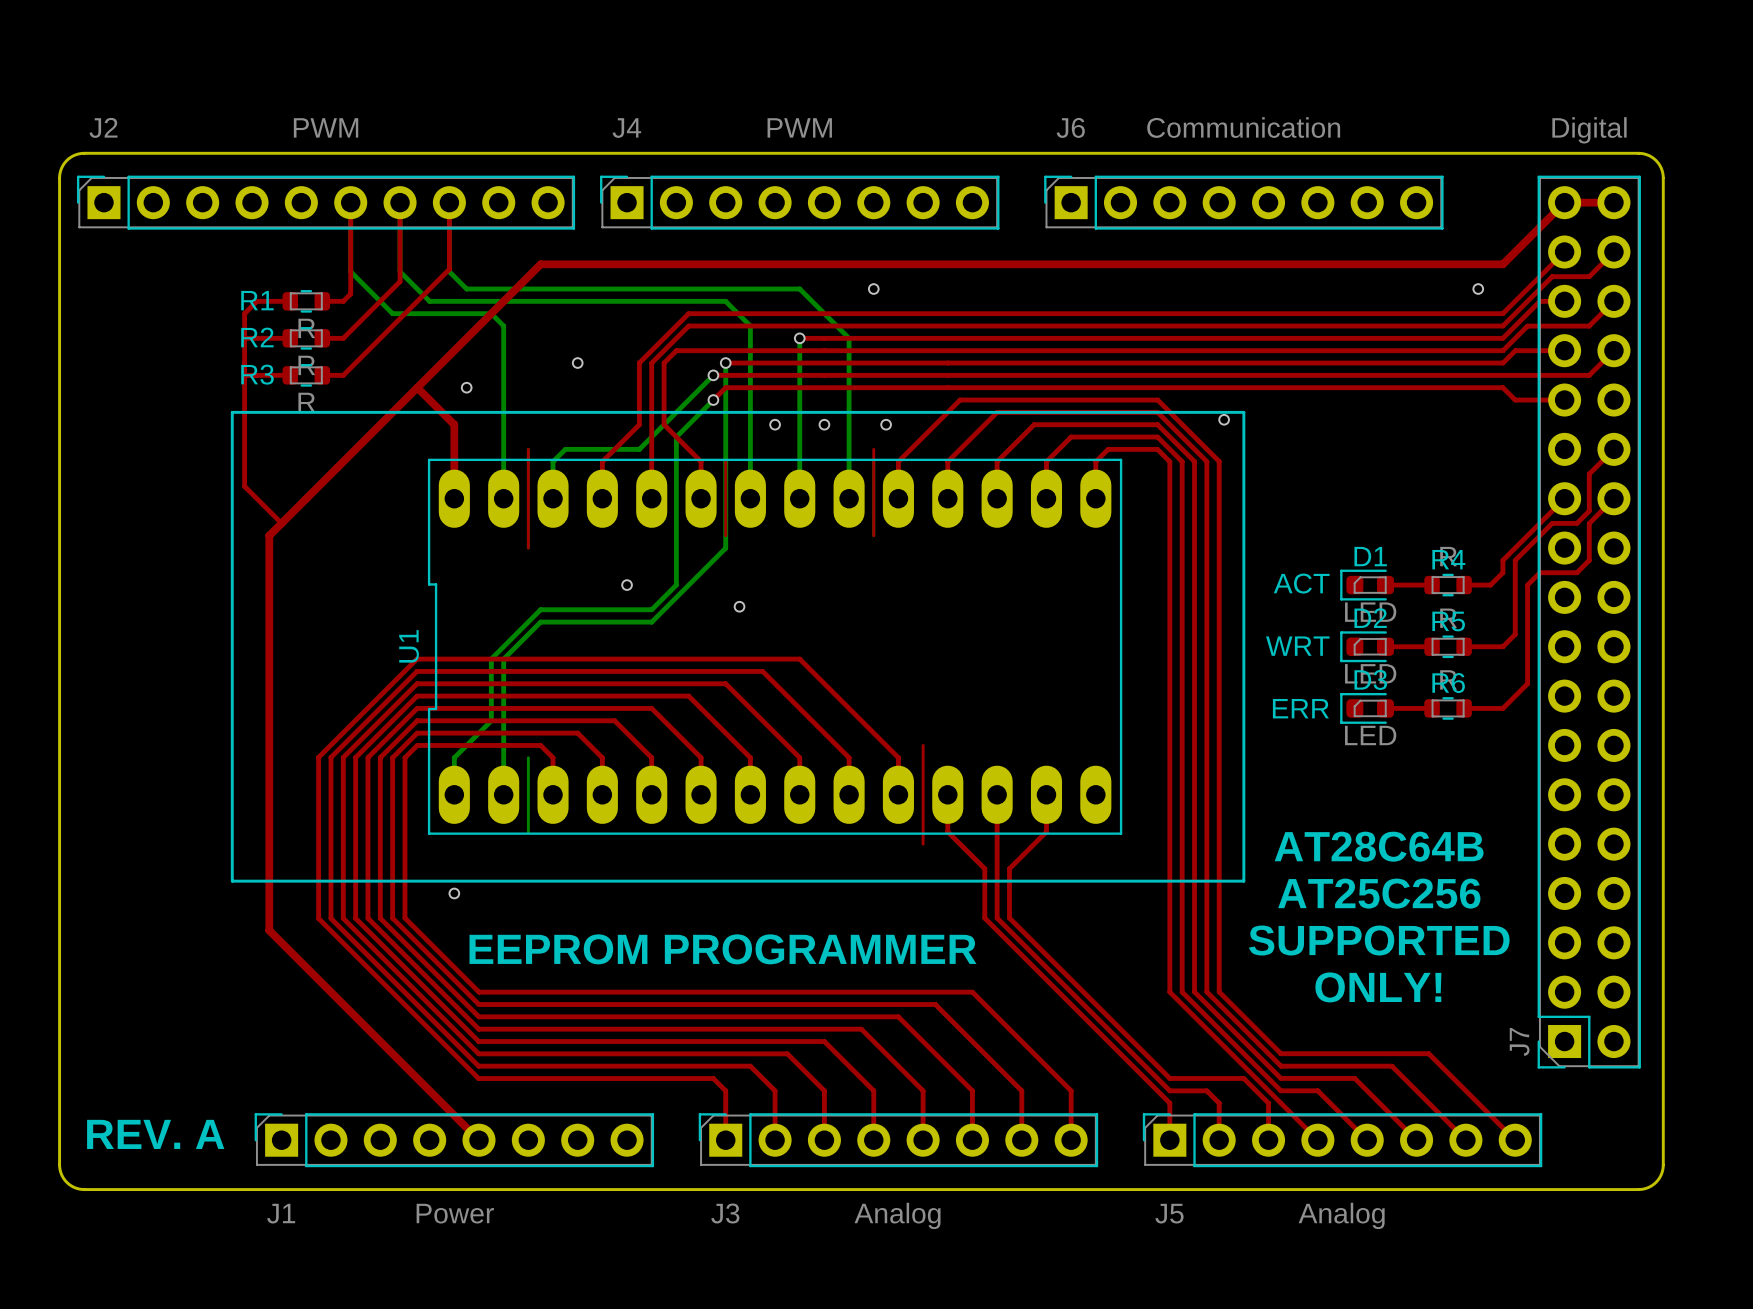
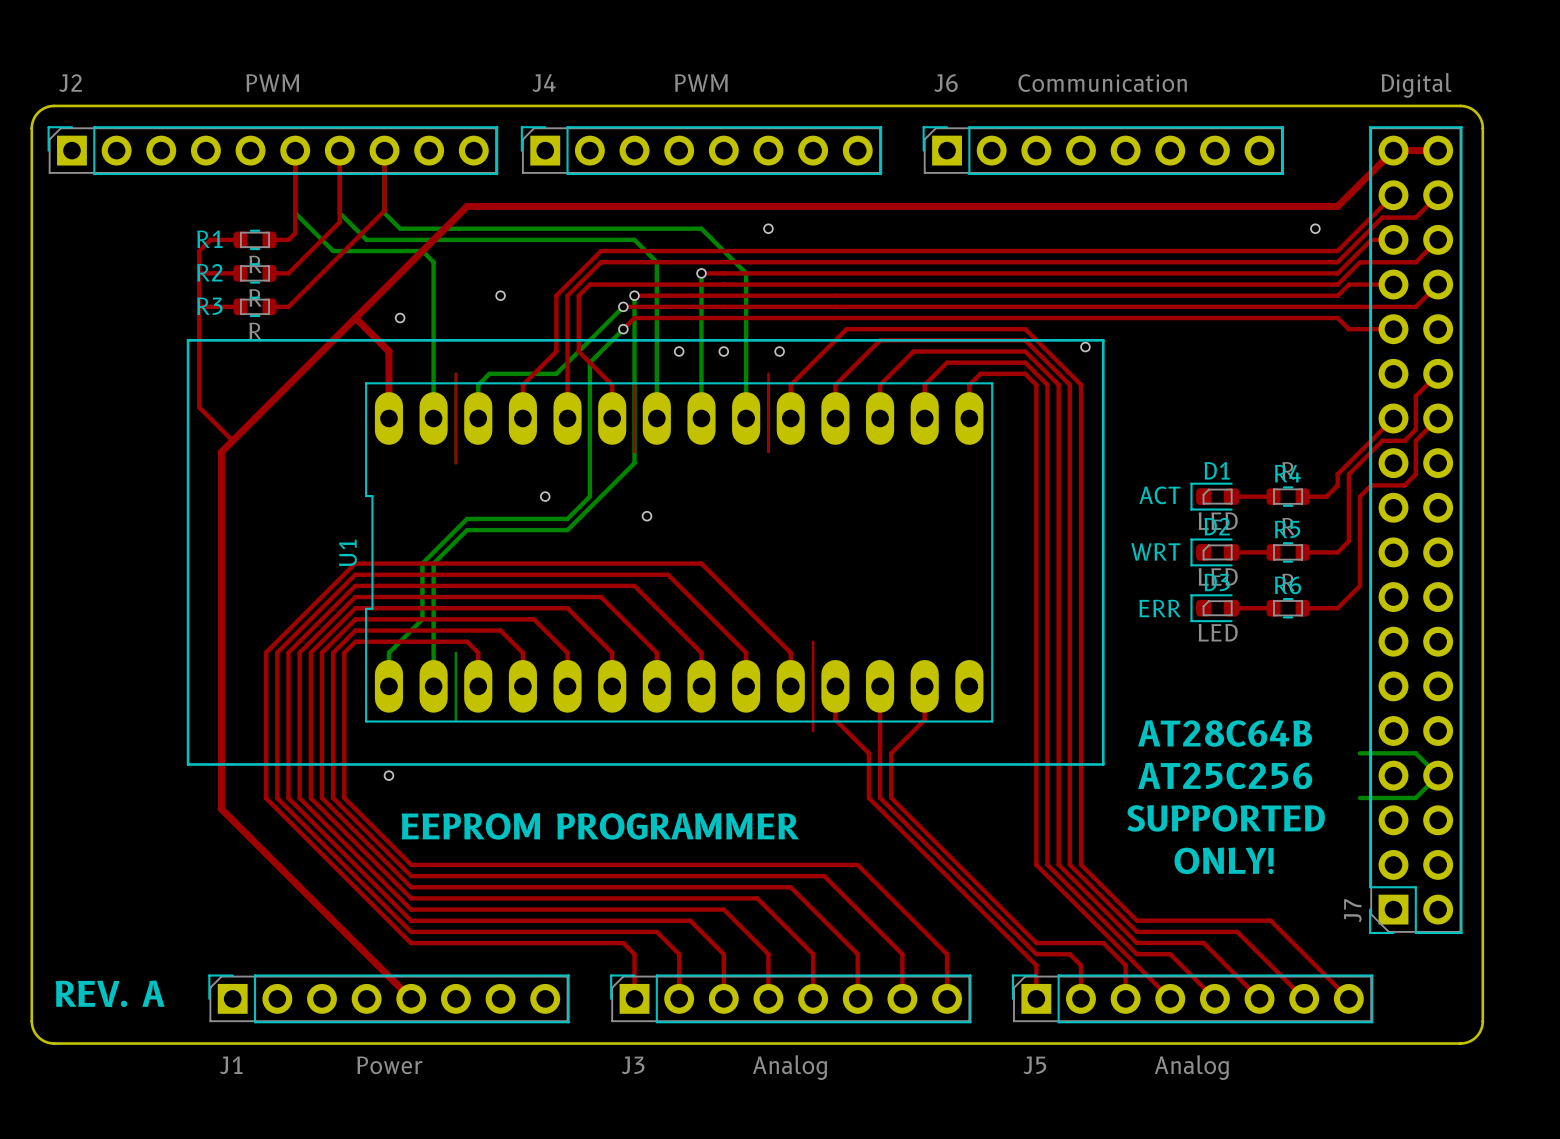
bottom track: none -> (1360, 753) (1415, 753) (1438, 775) (1415, 797) (1360, 797)

